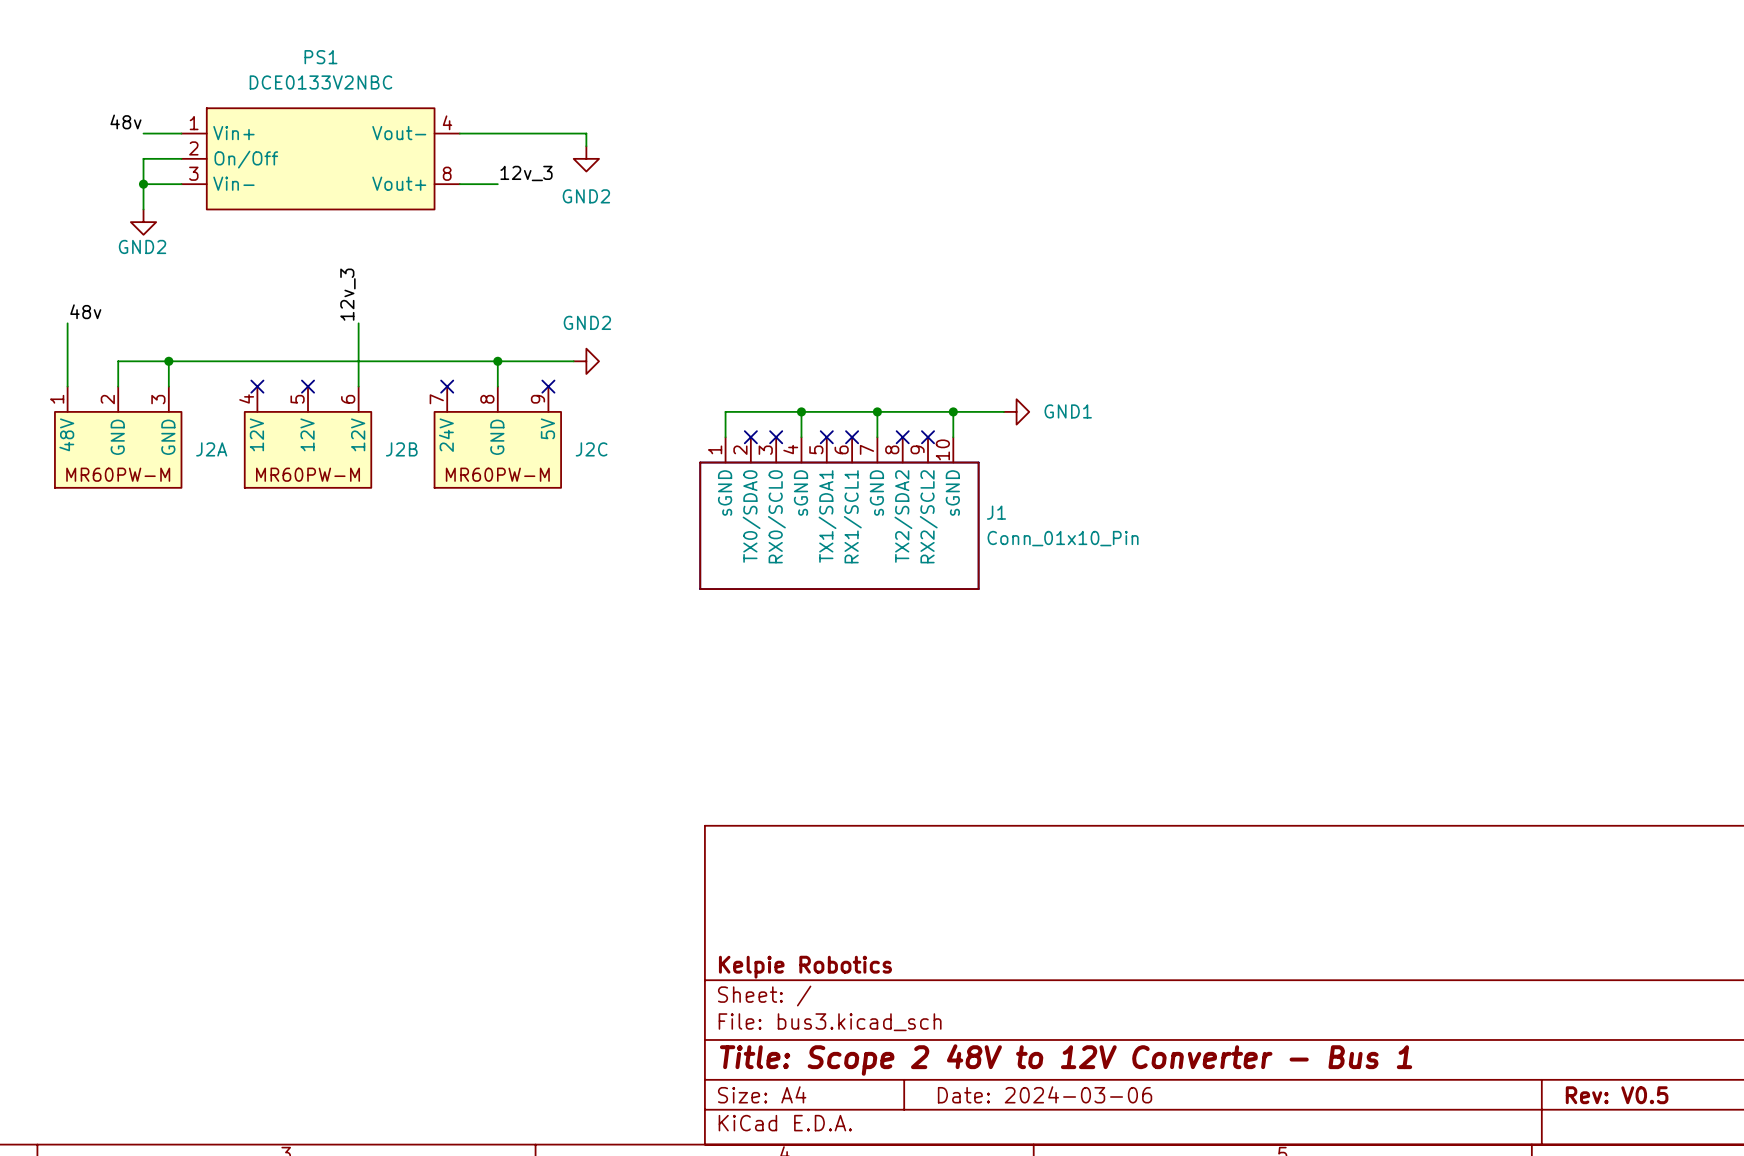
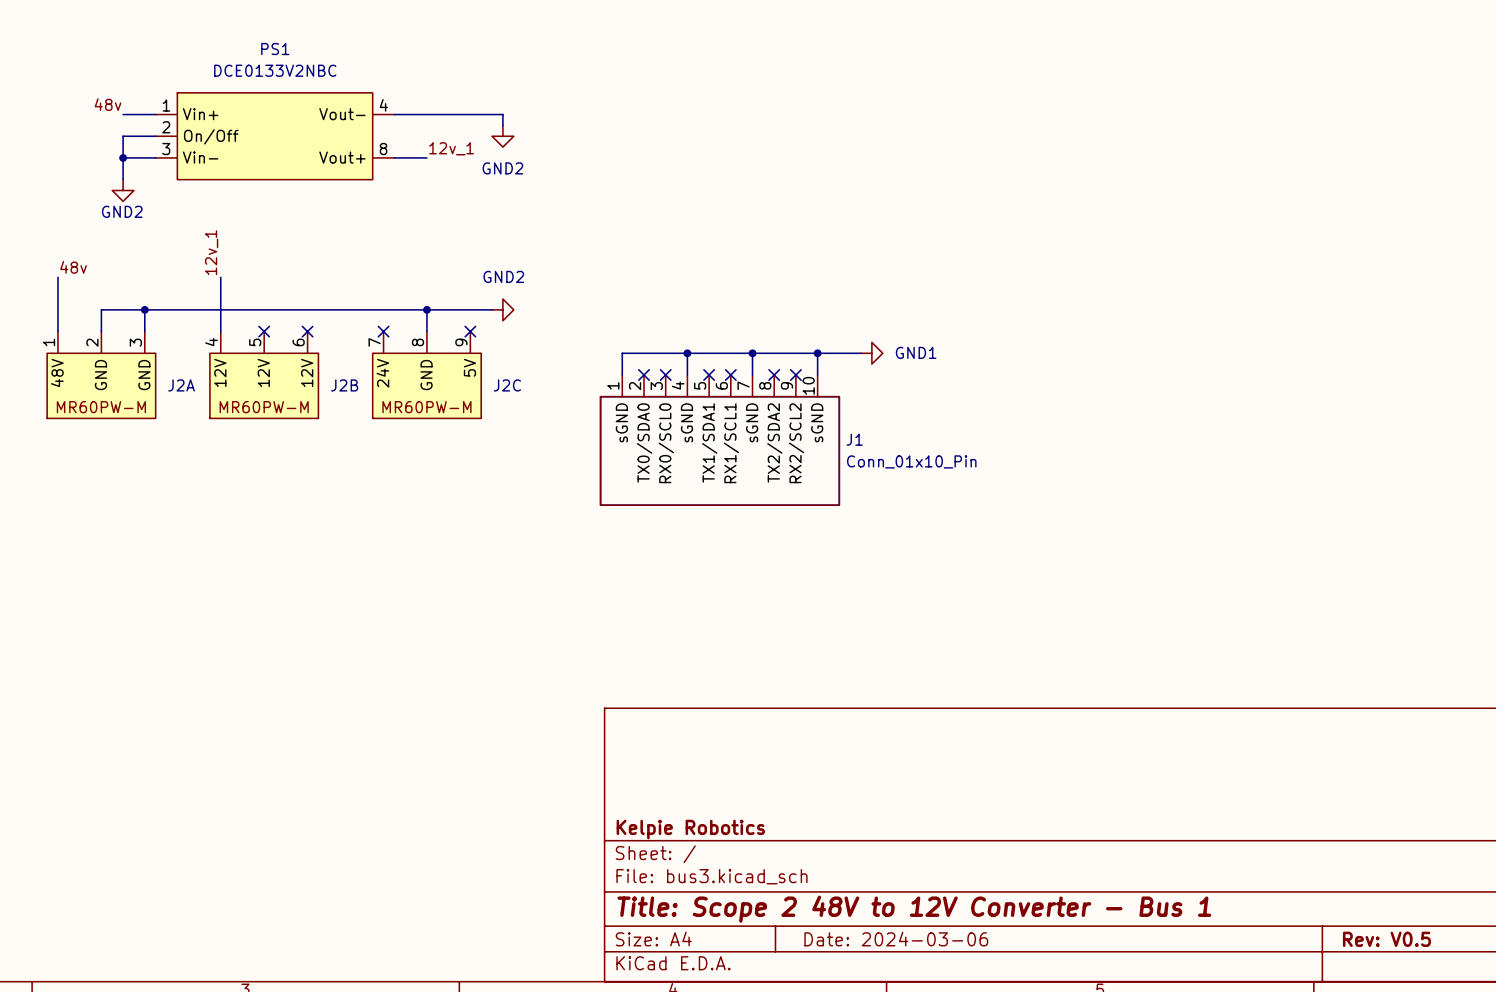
label: 12v_3 (526, 173) -> 12v_1 (451, 148)
label: none -> 12v_1 (211, 252)
label: 12v_3 (347, 294) -> none
wire: (358, 323) (358, 386) -> (220, 277) (220, 331)
no-connect mark: (257, 386) -> none
no-connect mark: none -> (307, 331)

